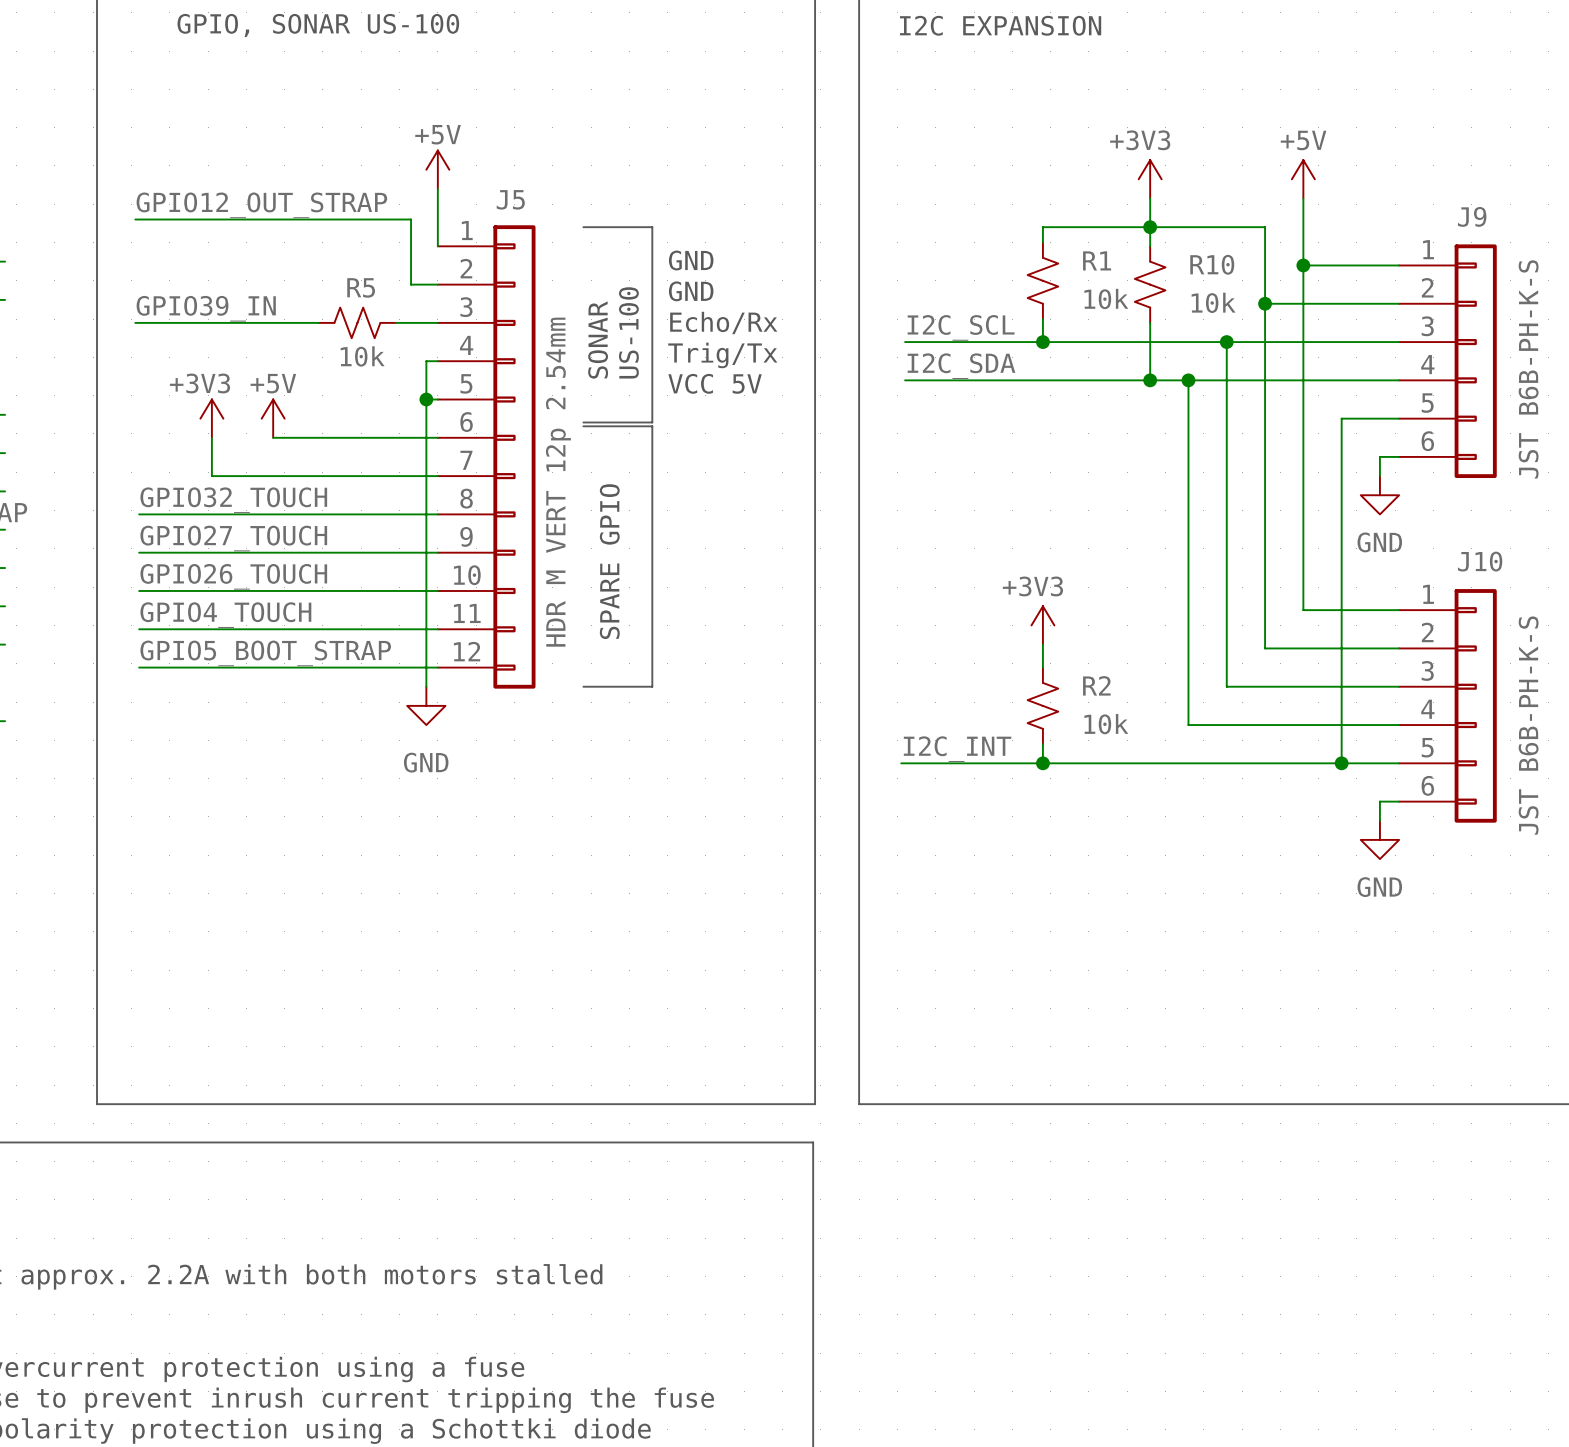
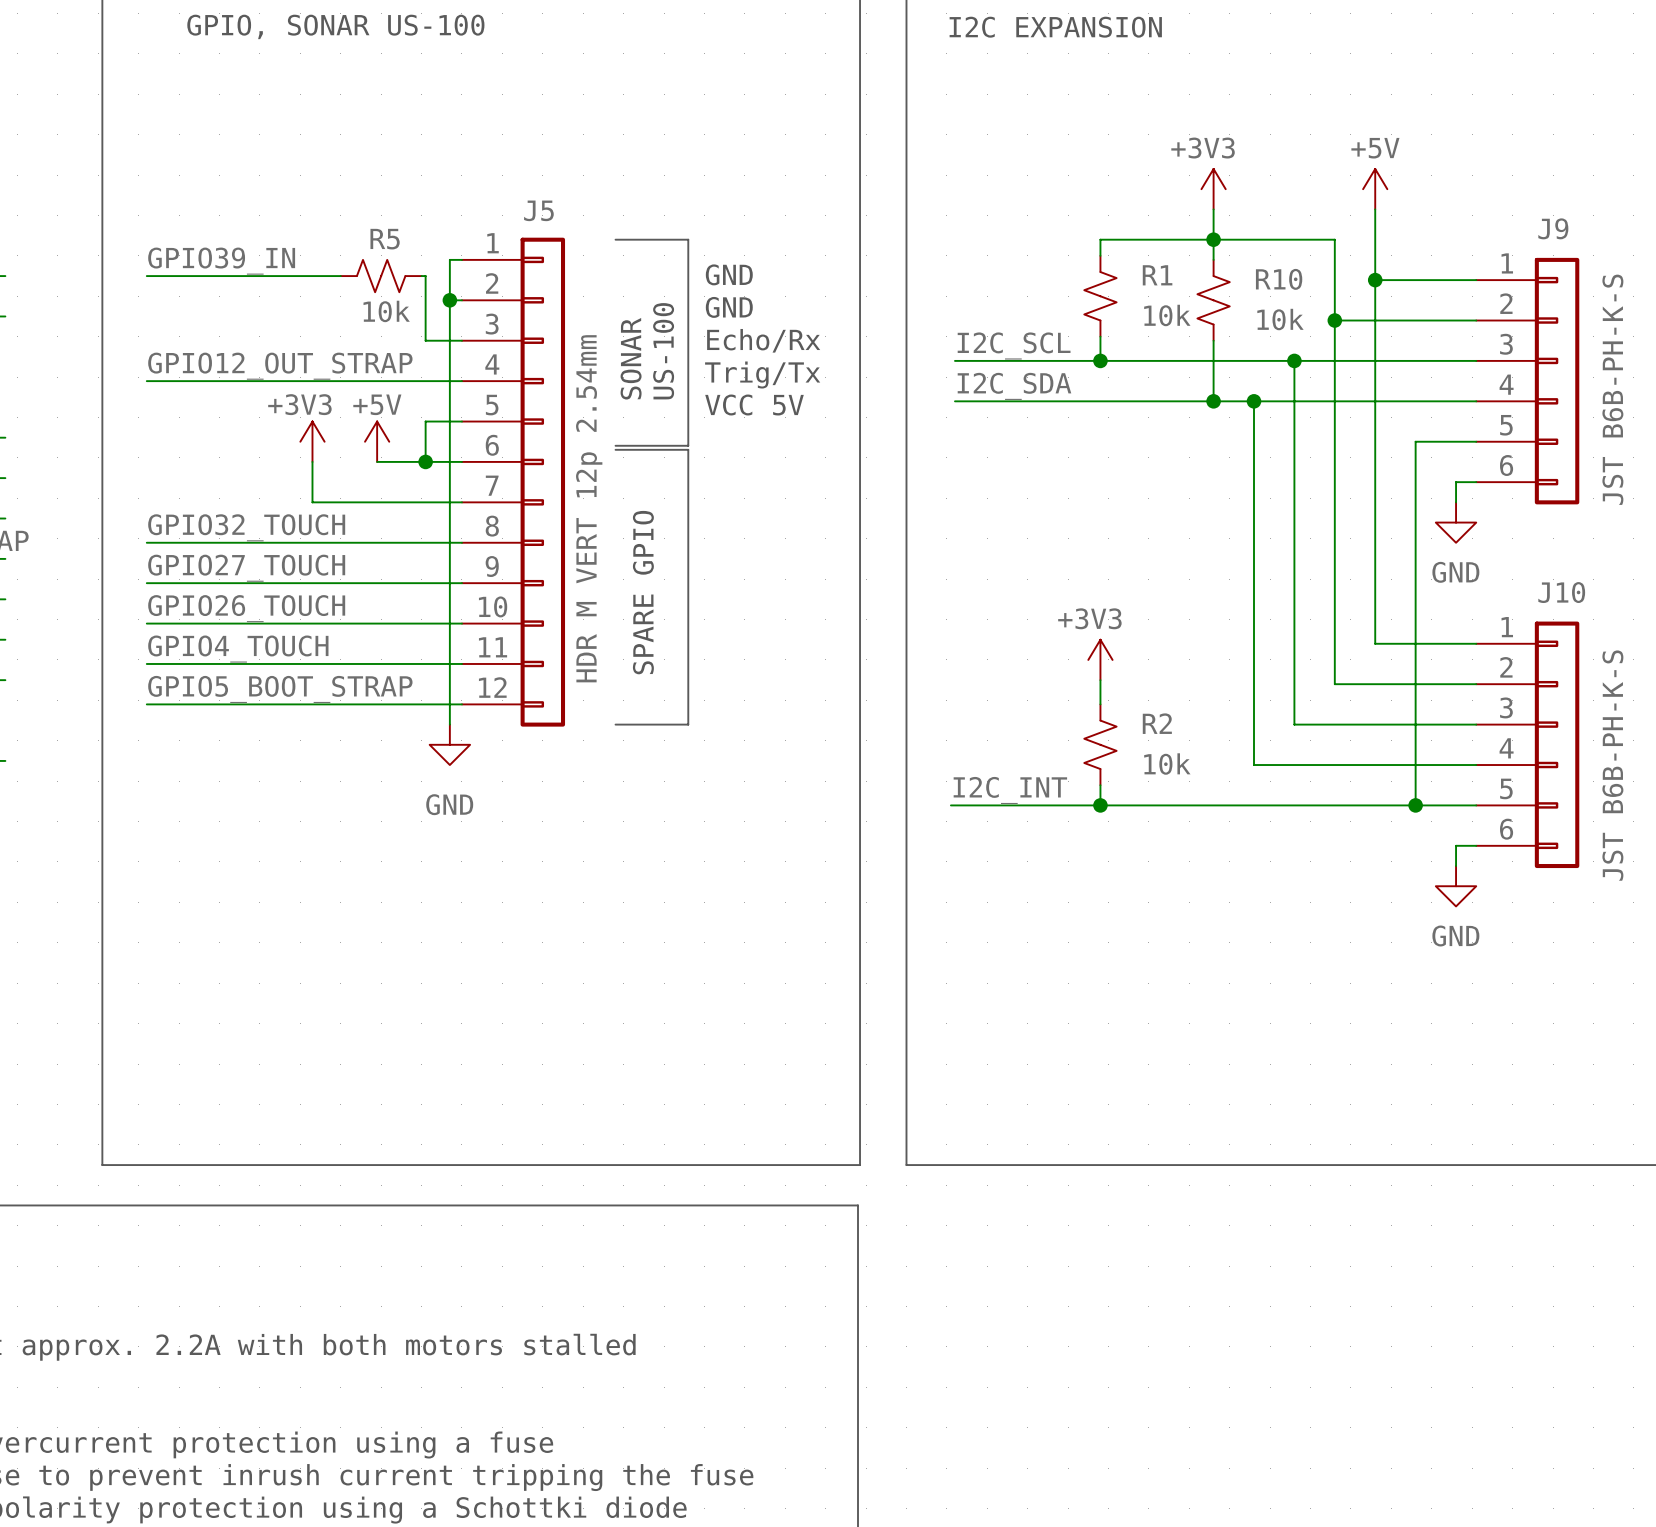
power symbol: +5V (437, 169) -> none
wire: (437, 188) (437, 246) -> (146, 381) (449, 381) (449, 259) (461, 259)
label position: GPIO12_OUT_STRAP (261, 205) -> GPIO12_OUT_STRAP (280, 366)
wire: (135, 219) (411, 219) (411, 284) (426, 284) -> none
junction: none -> (449, 300)
label position: GPIO39_IN (206, 308) -> GPIO39_IN (221, 261)
wire: (135, 322) (319, 322) -> (146, 276) (340, 276)
R5 position: (357, 322) -> (381, 276)
wire: (395, 322) (403, 322) -> (421, 276) (425, 276) (425, 340)
wire: none -> (449, 421) (425, 421) (425, 461)
junction position: (426, 399) -> (425, 461)
power symbol position: +3V3 (211, 418) -> +3V3 (312, 441)
power symbol position: +5V (273, 418) -> +5V (377, 441)
wire: (211, 437) (211, 476) (296, 476) -> (312, 461) (312, 502)
wire: (273, 437) (357, 437) -> none

